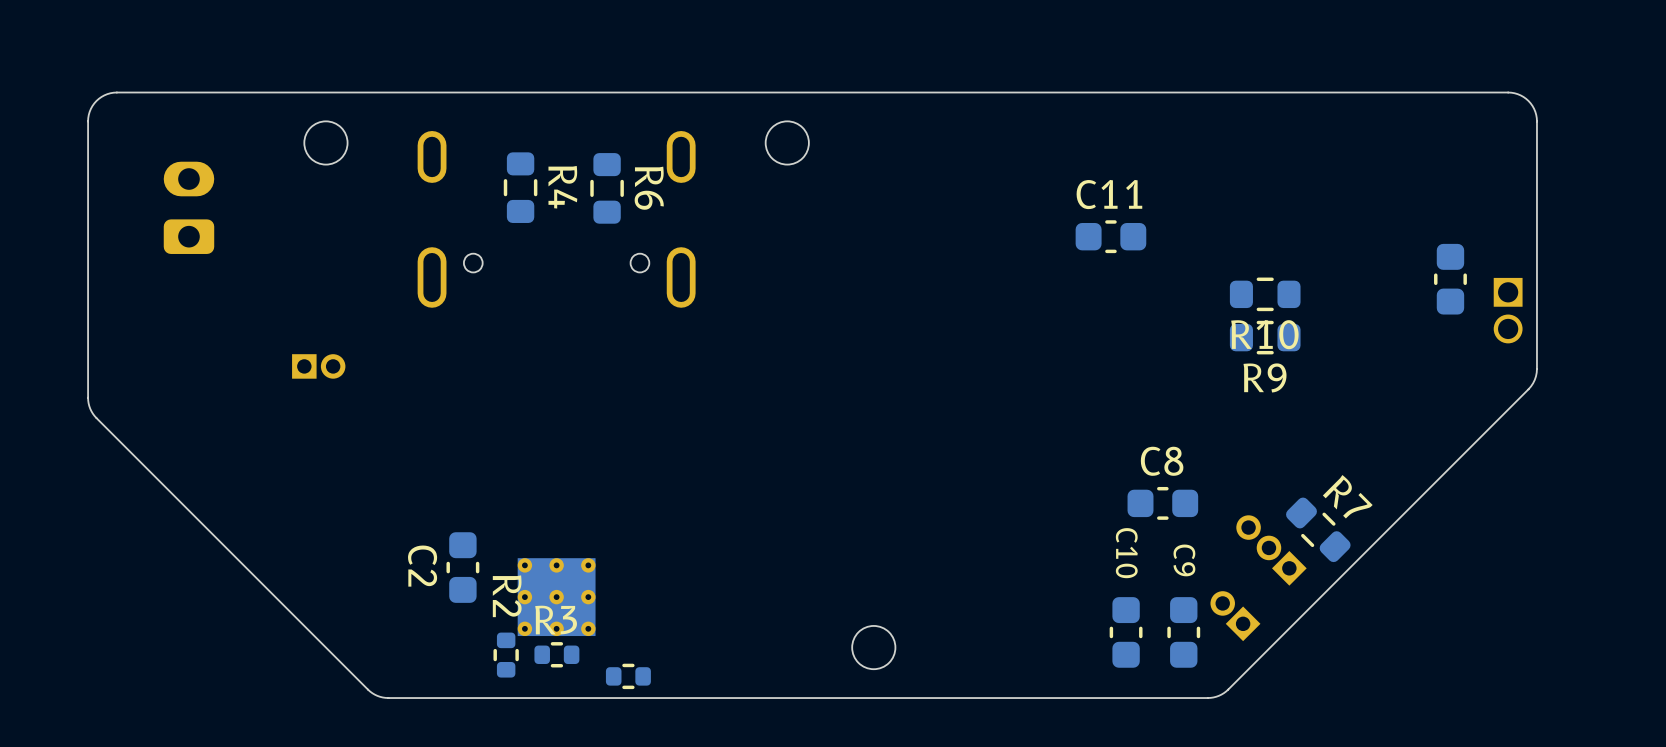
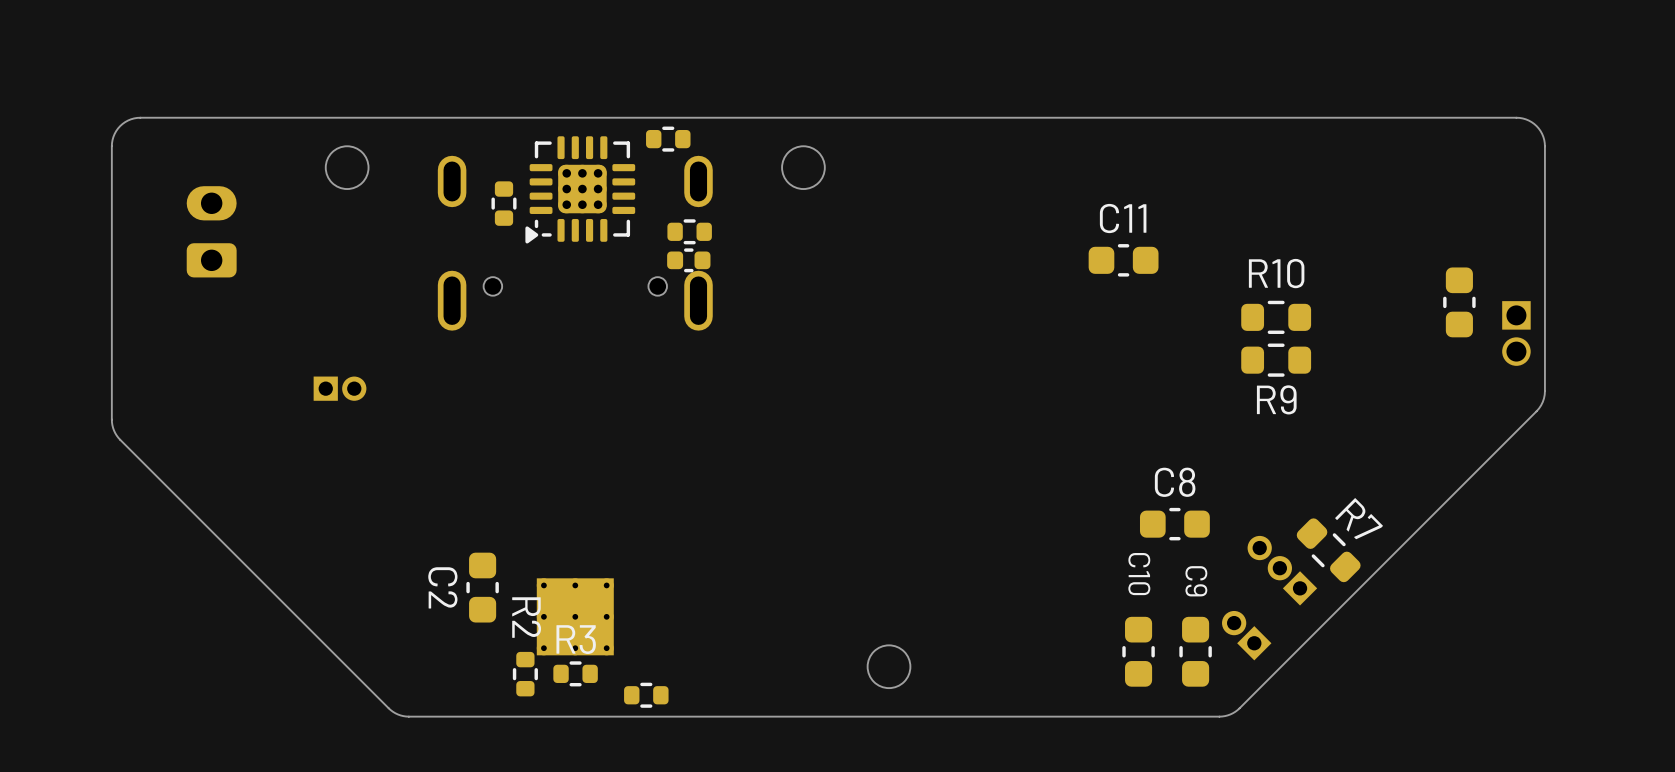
part: none -> (668, 139)
part: none -> (580, 189)
part: none -> (504, 203)
R4: (520, 187) -> none
R6: (607, 188) -> none
part: none -> (689, 231)
part: none -> (688, 260)
R10 name position: R10 (1264, 334) -> R10 (1276, 273)

